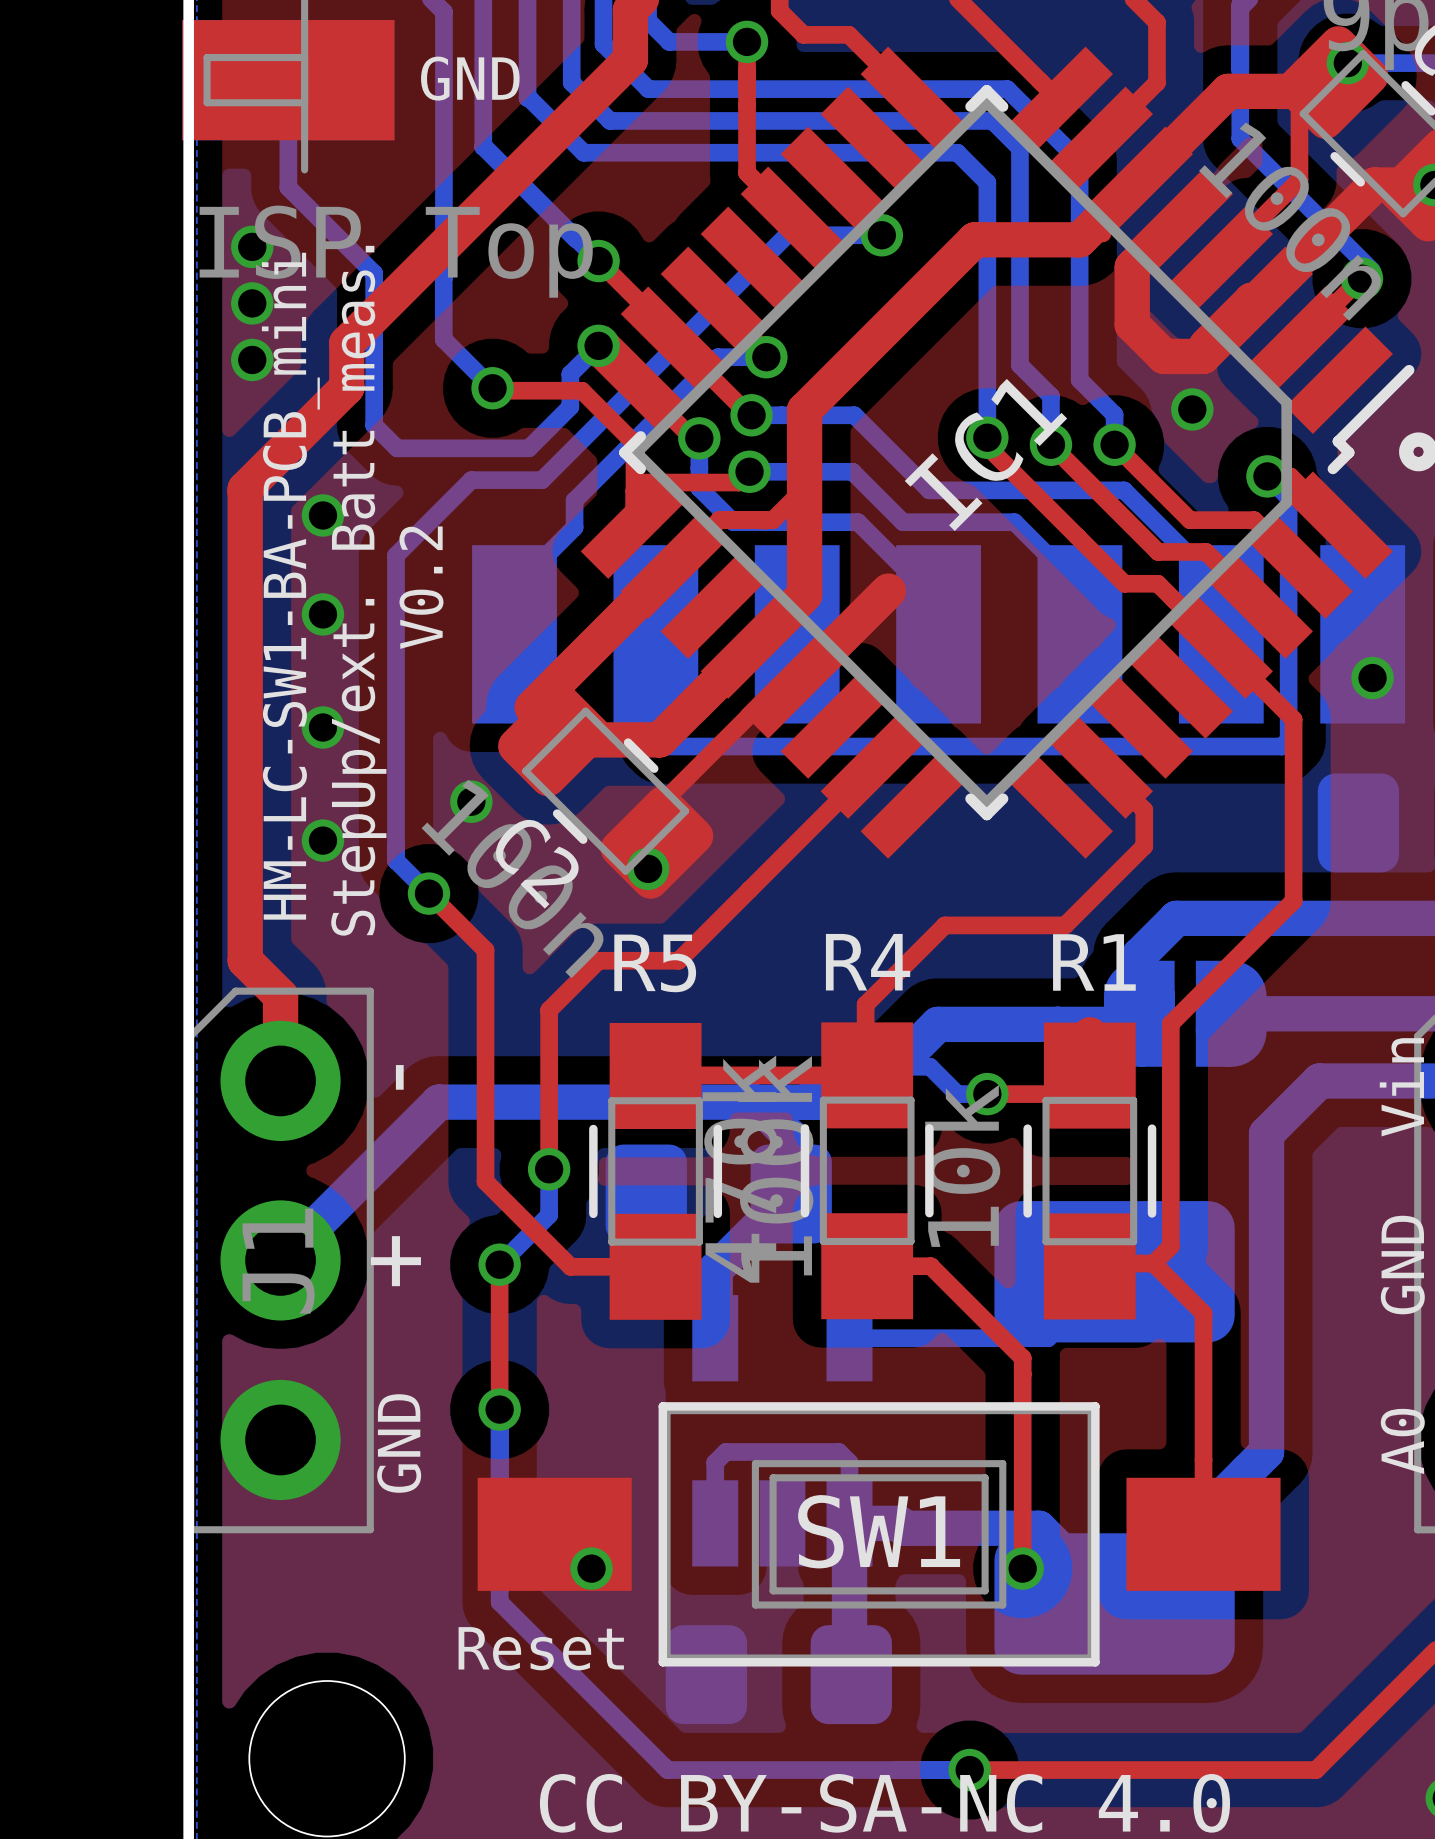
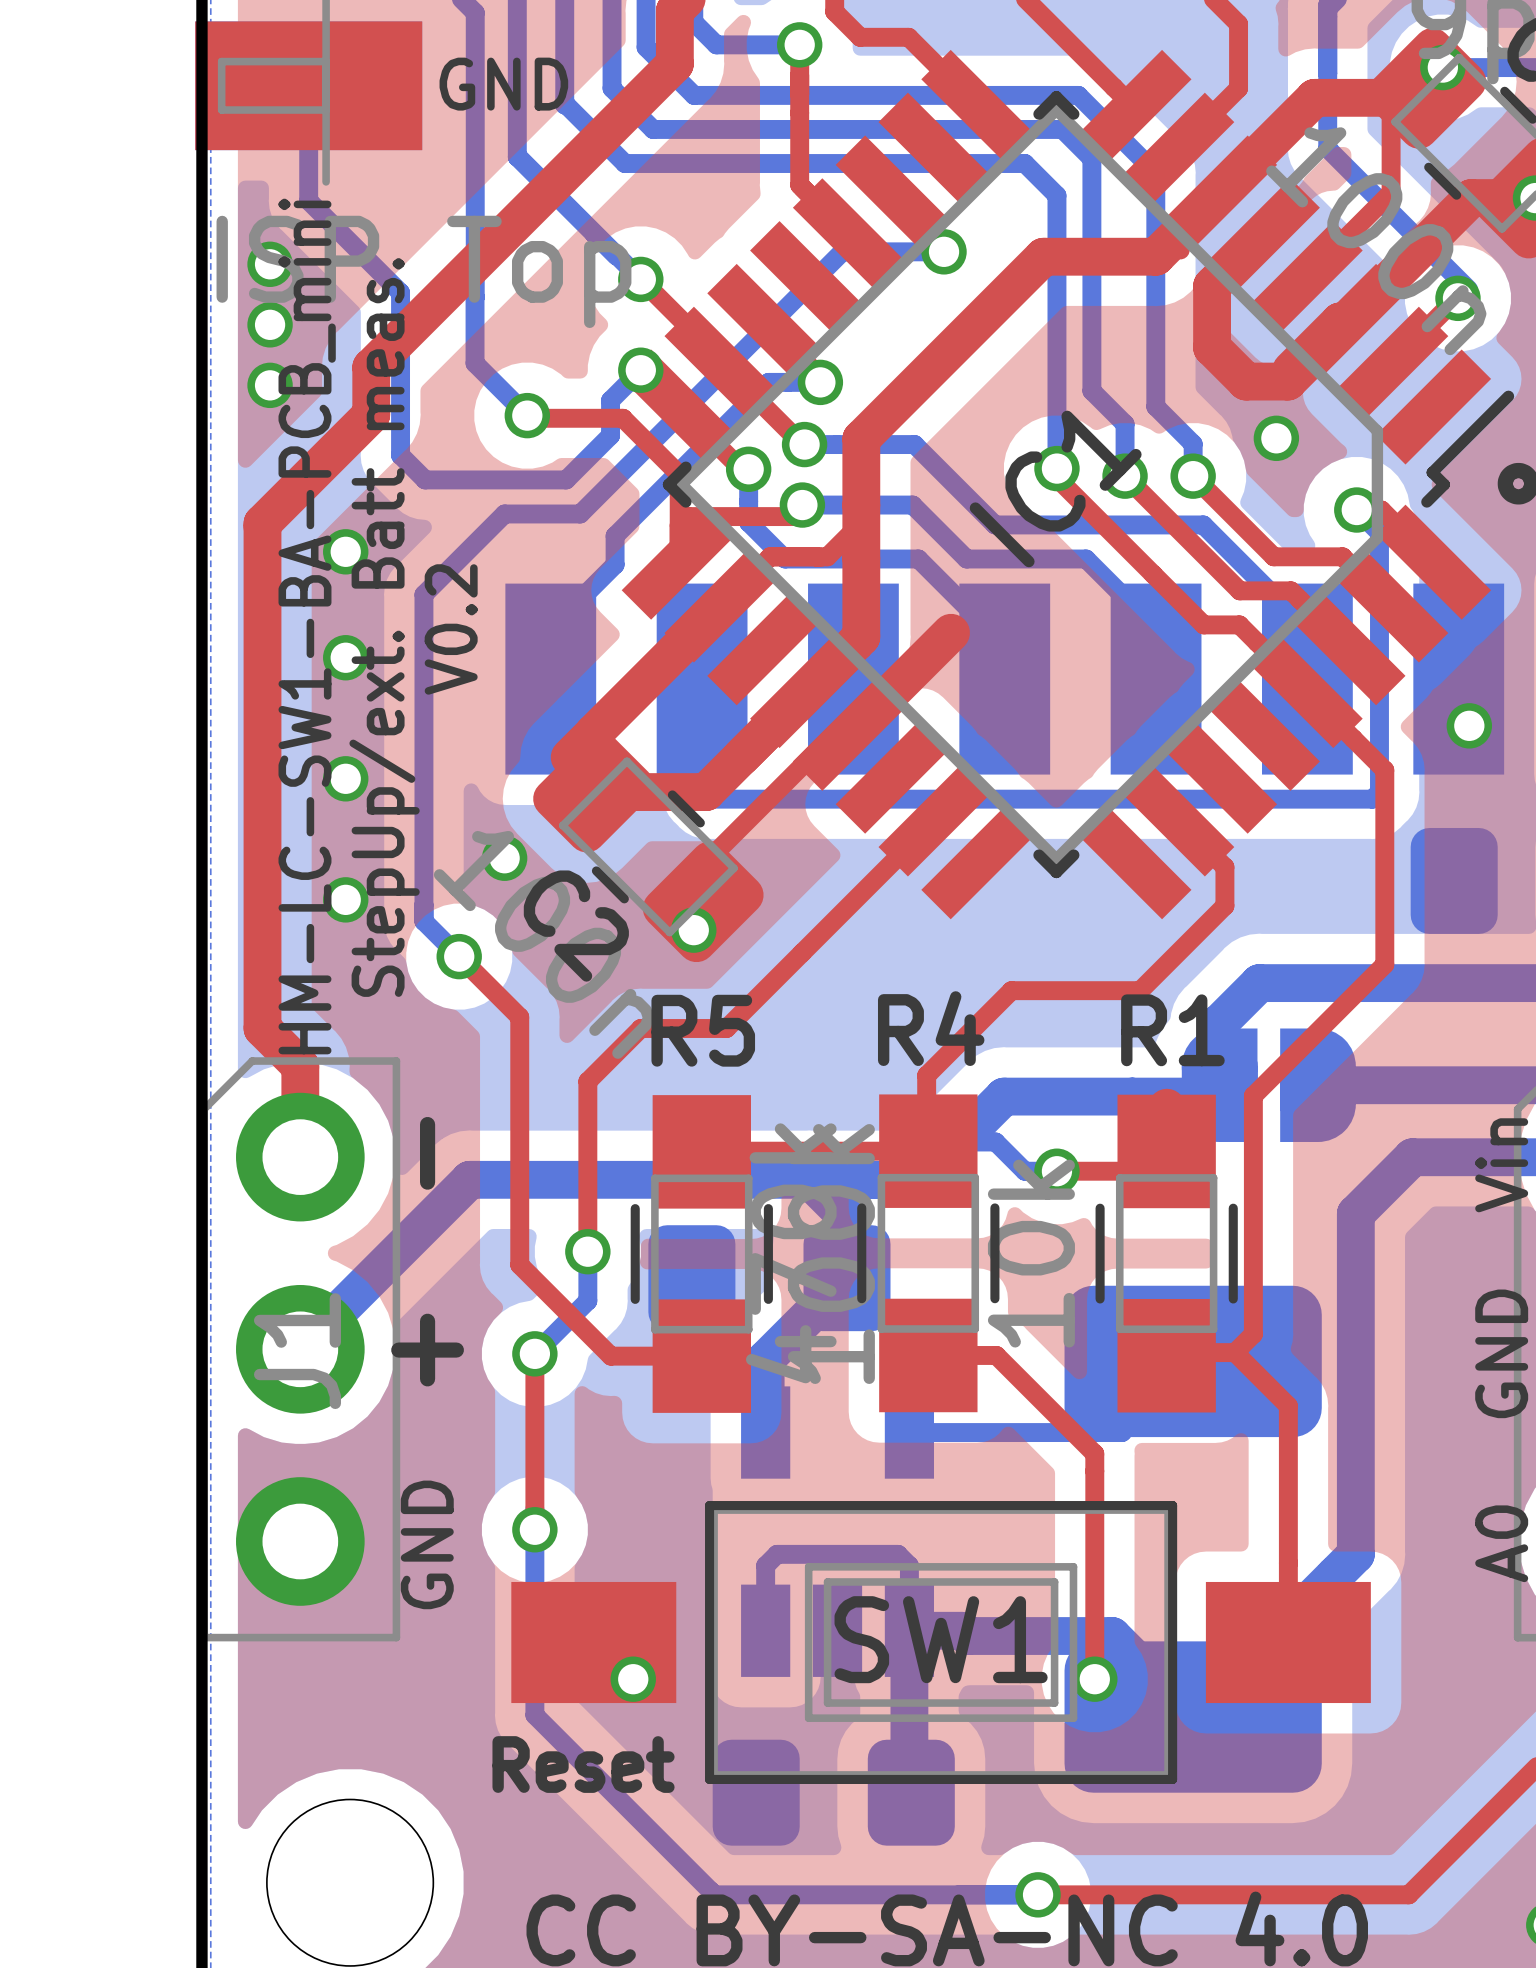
via position: (499, 1409) -> (534, 1529)

